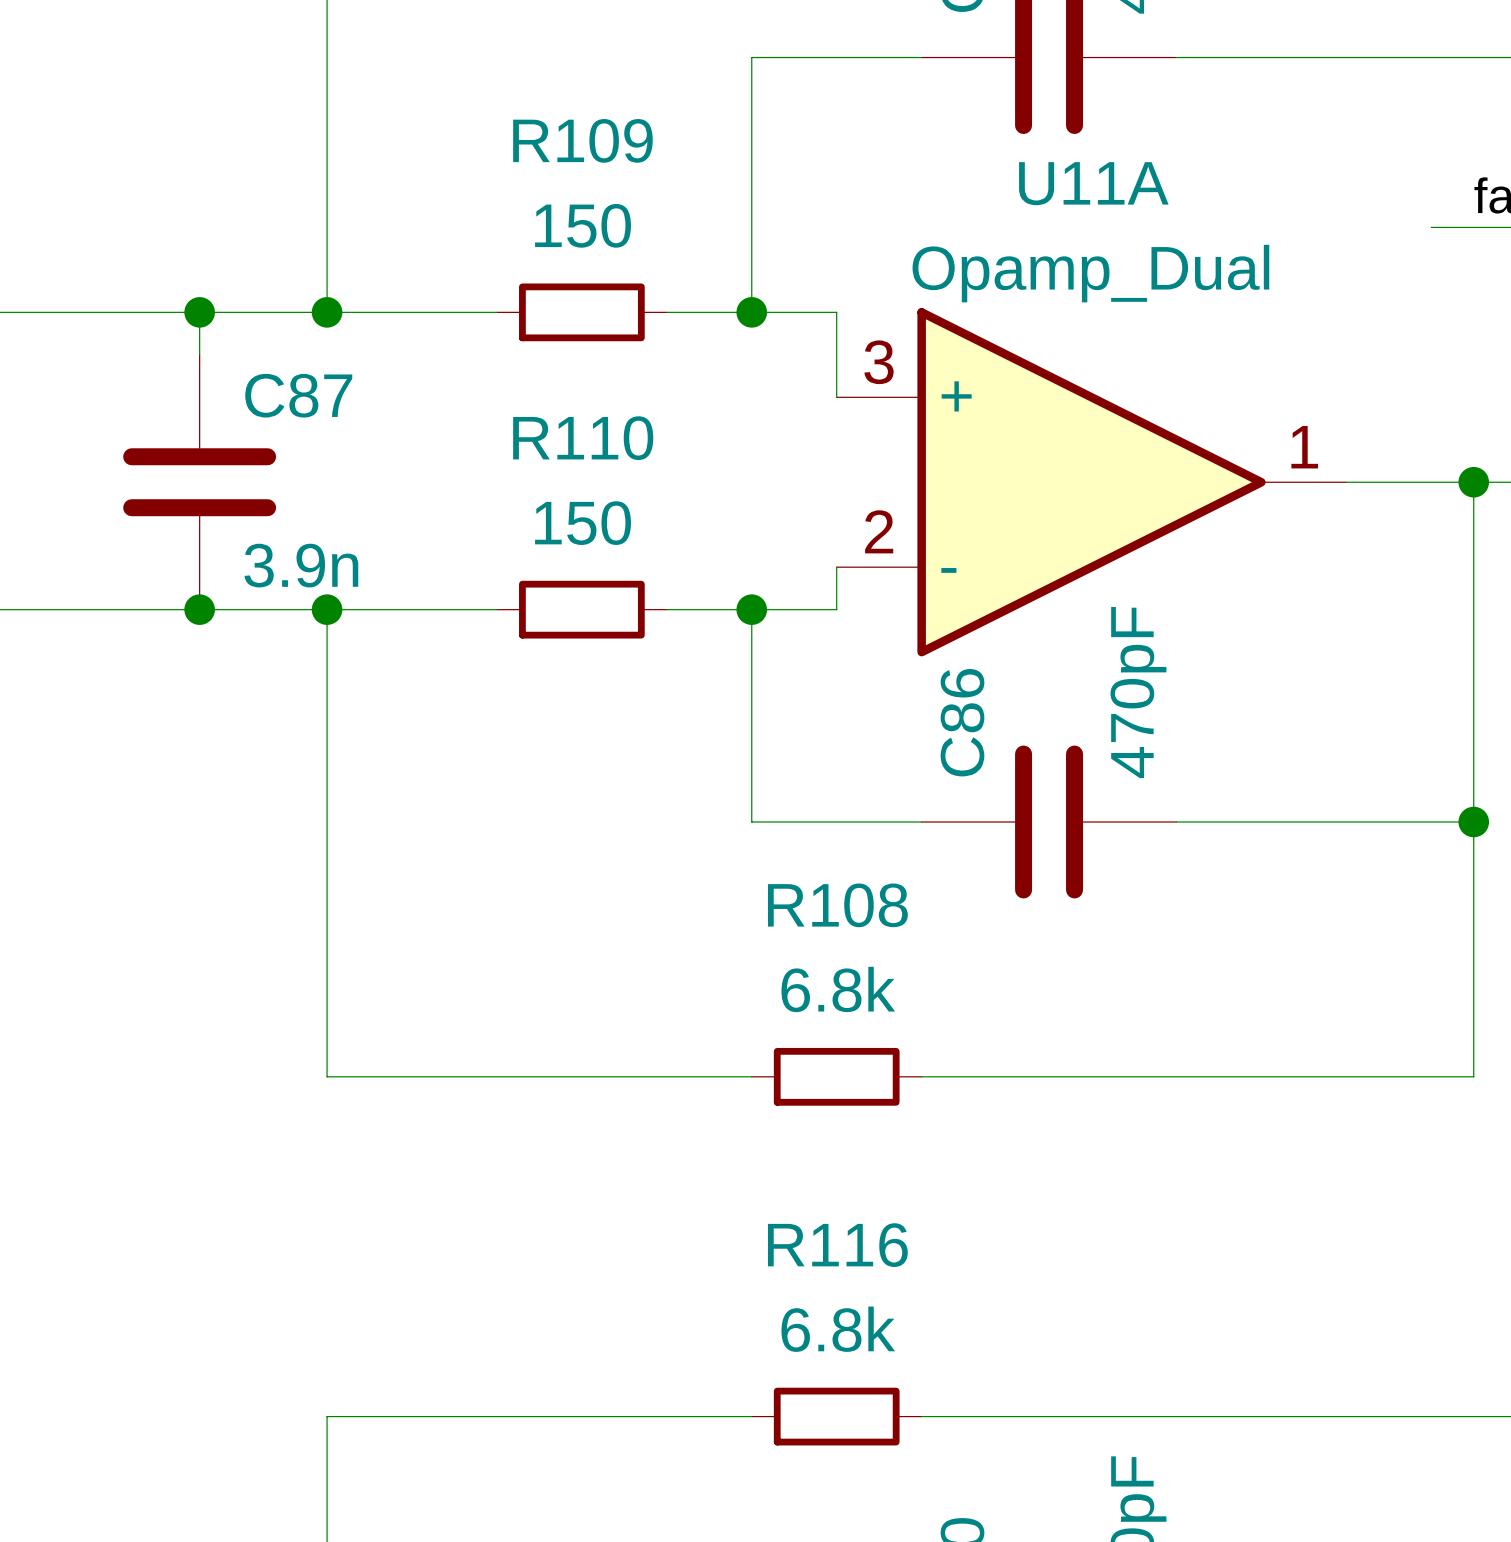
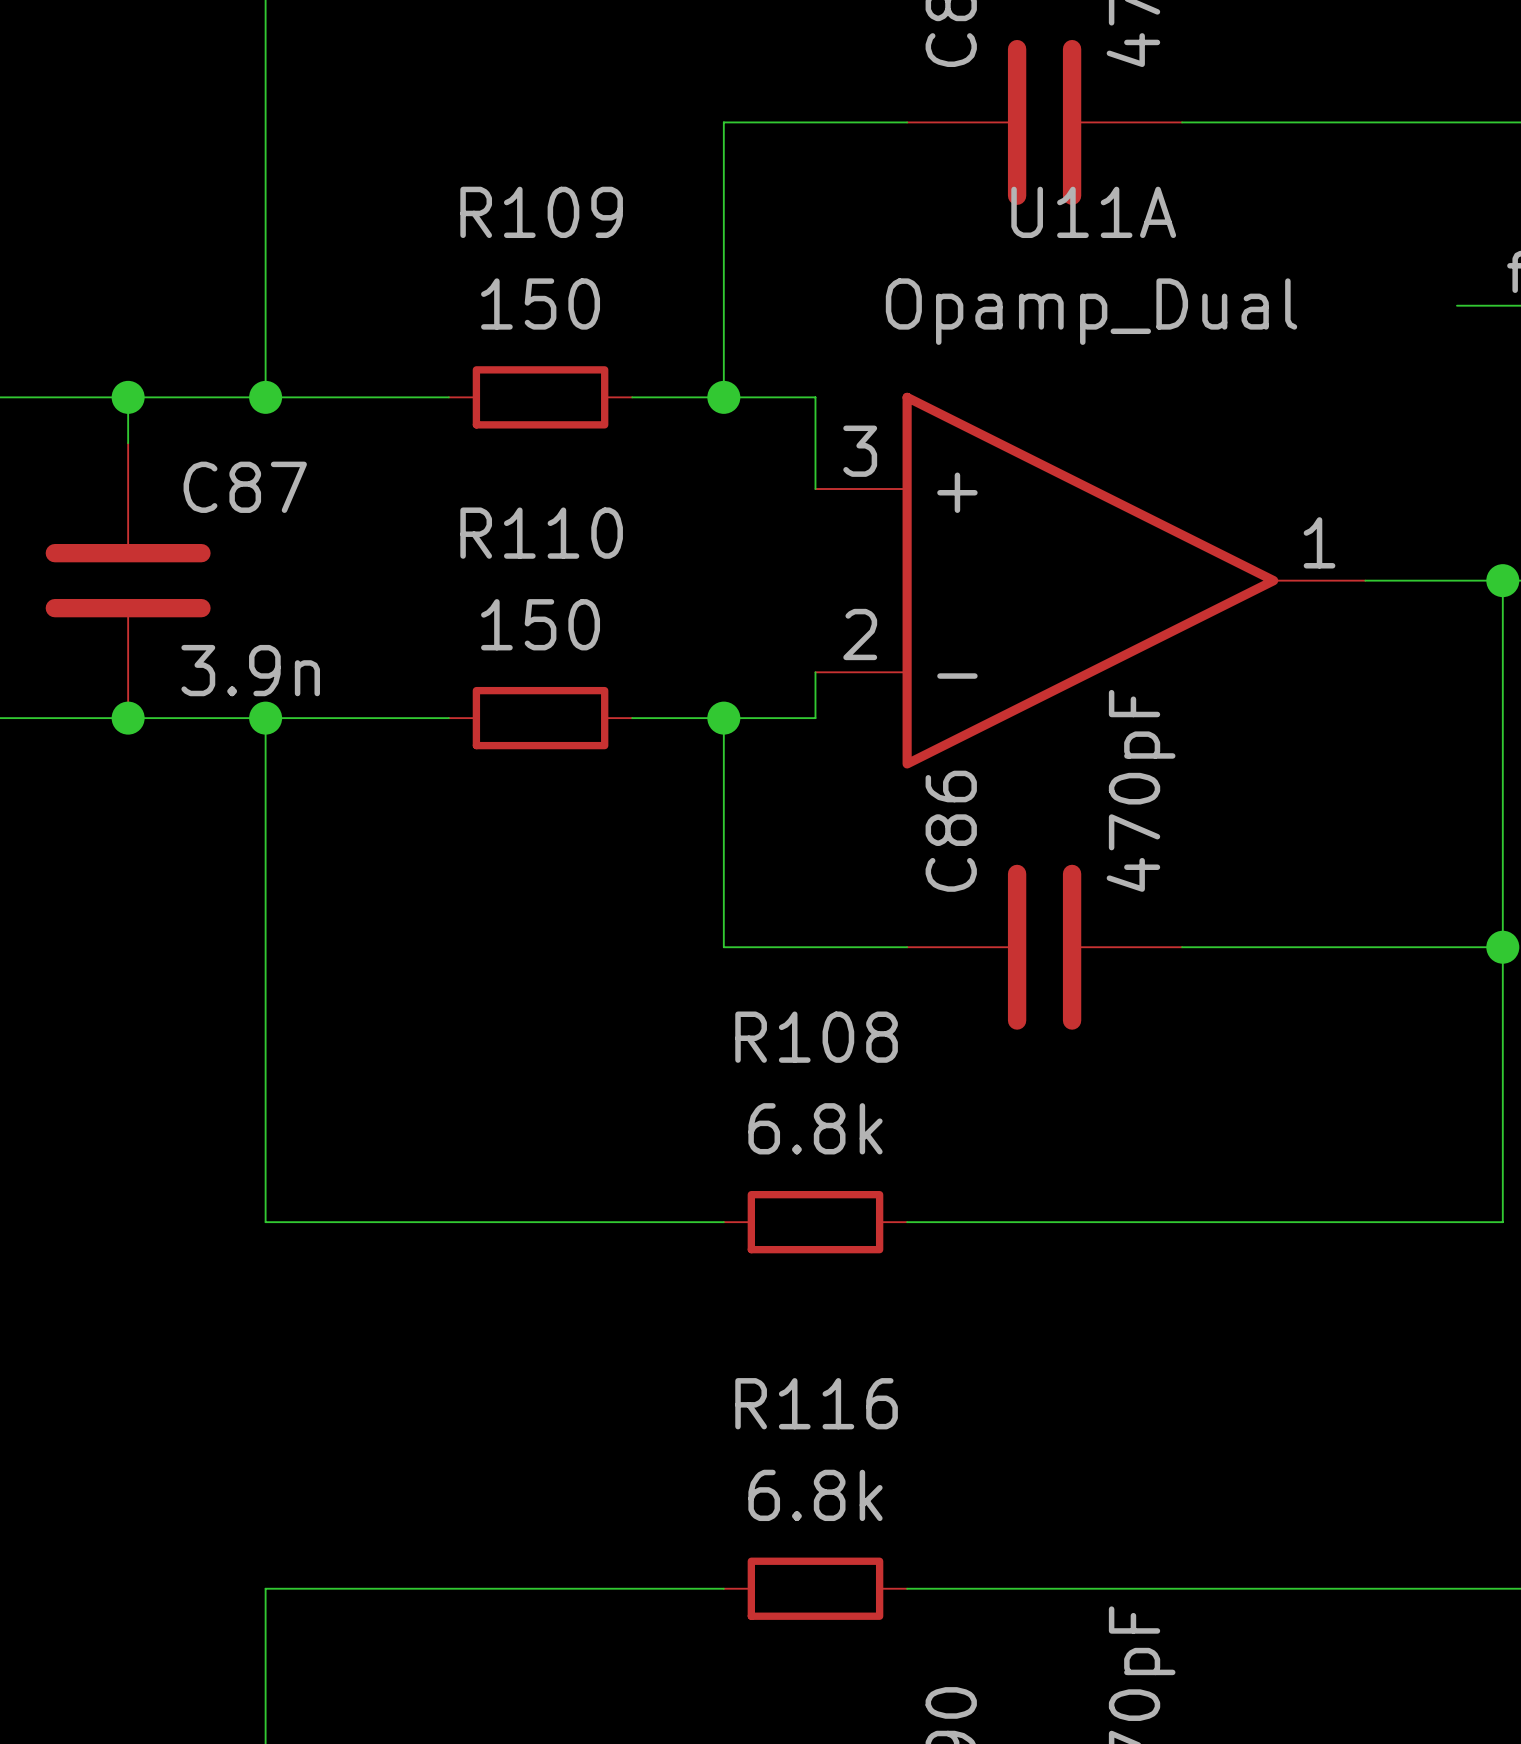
U11A name position: U11A (1093, 183) -> U11A (1093, 212)
U11A value position: Opamp_Dual (1090, 273) -> Opamp_Dual (1091, 311)

